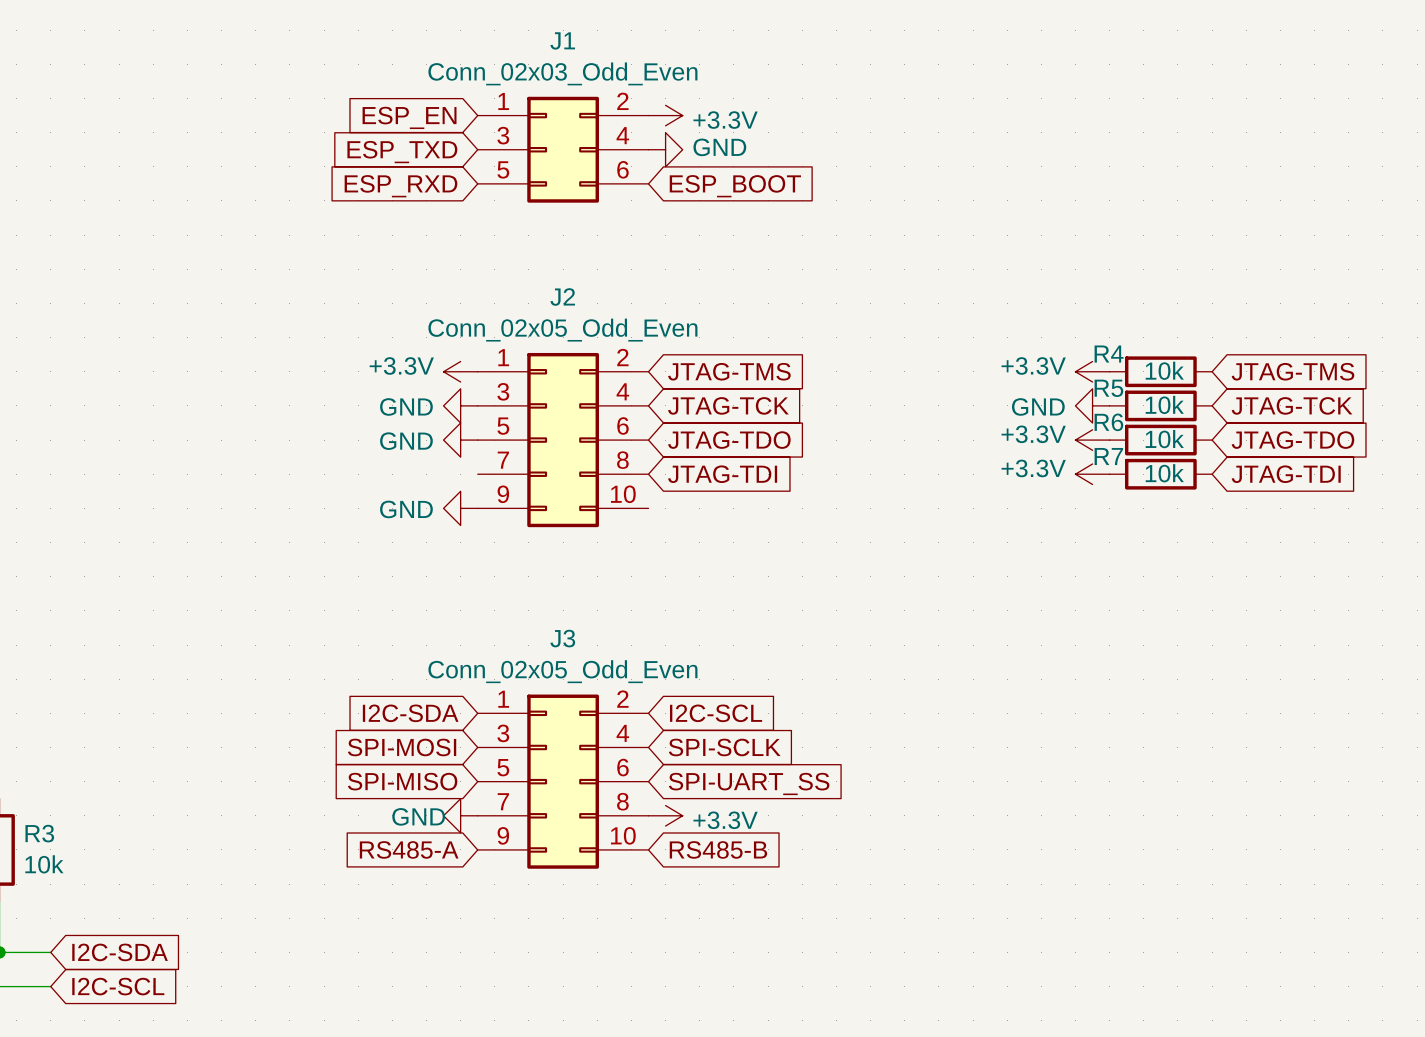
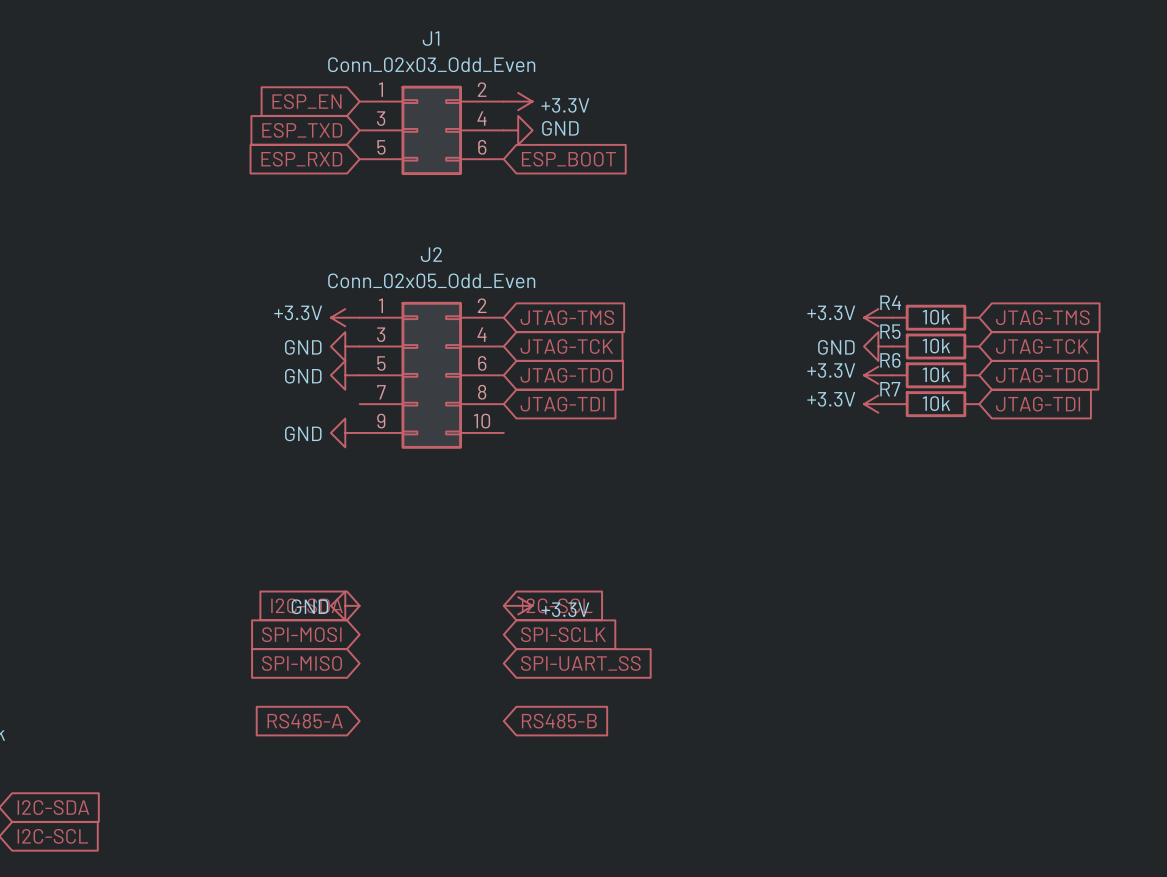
J3: Conn_02x05_Odd_Even (563, 781) -> none
power symbol position: GND (460, 815) -> GND (345, 605)
power symbol position: +3.3V (665, 815) -> +3.3V (518, 605)

